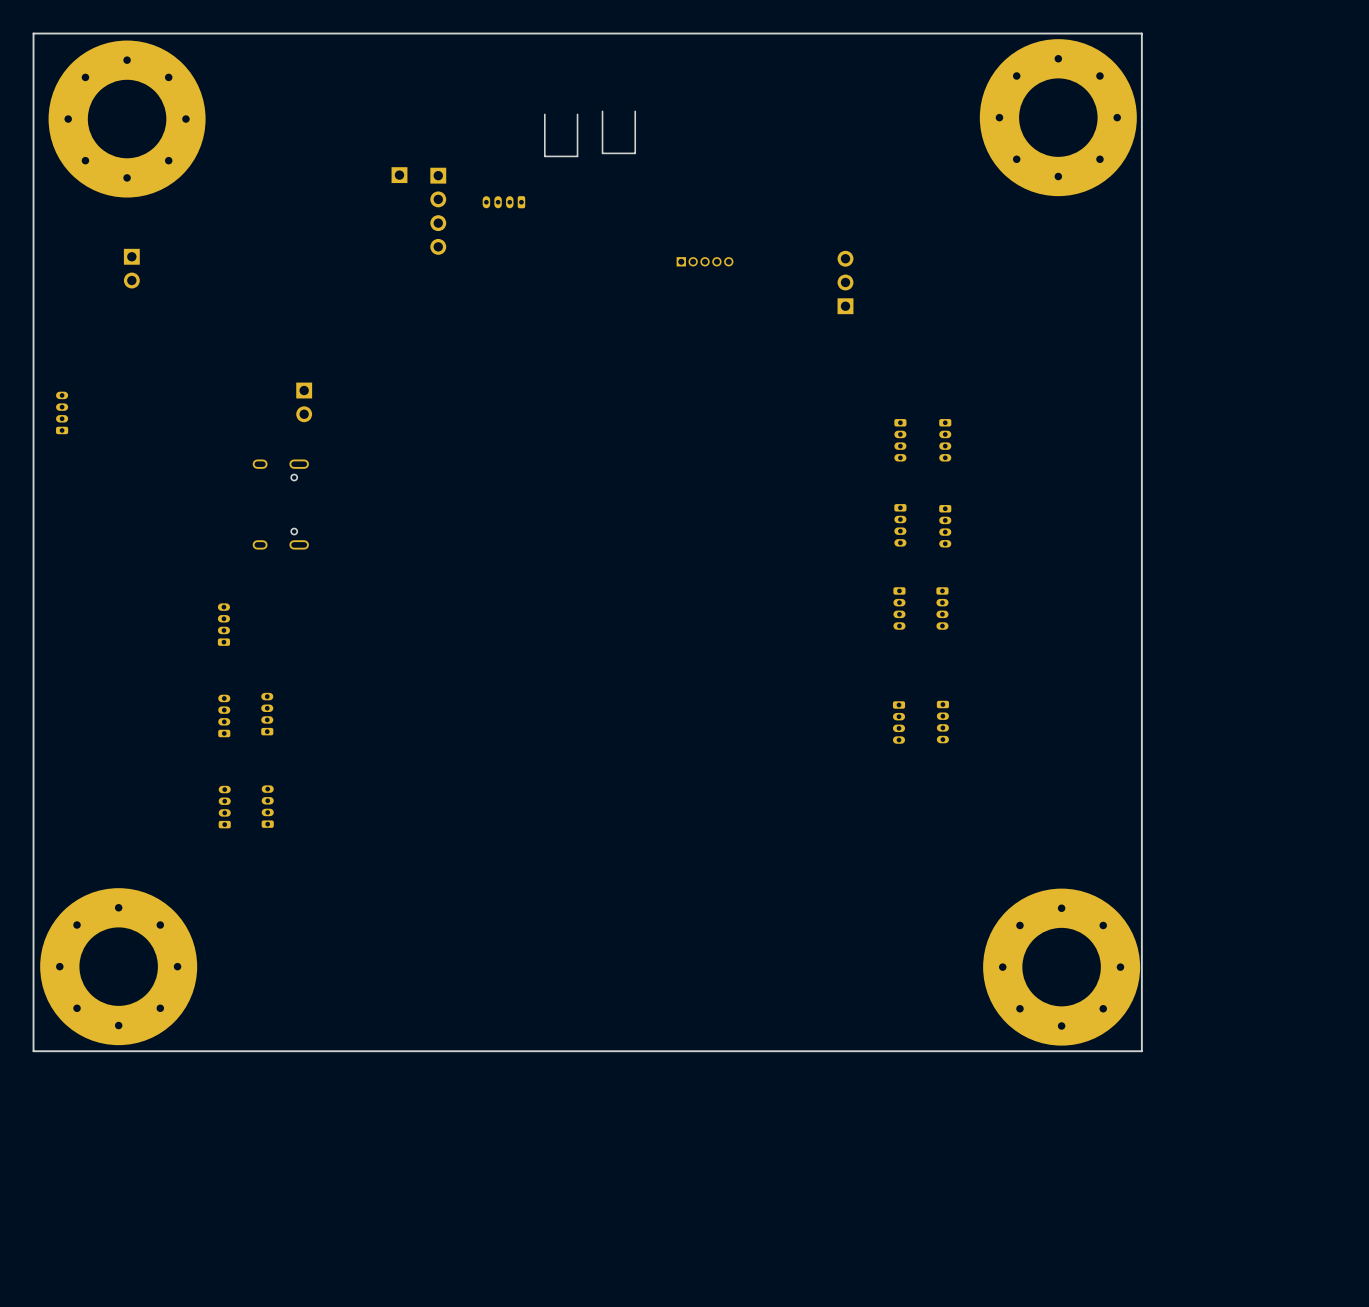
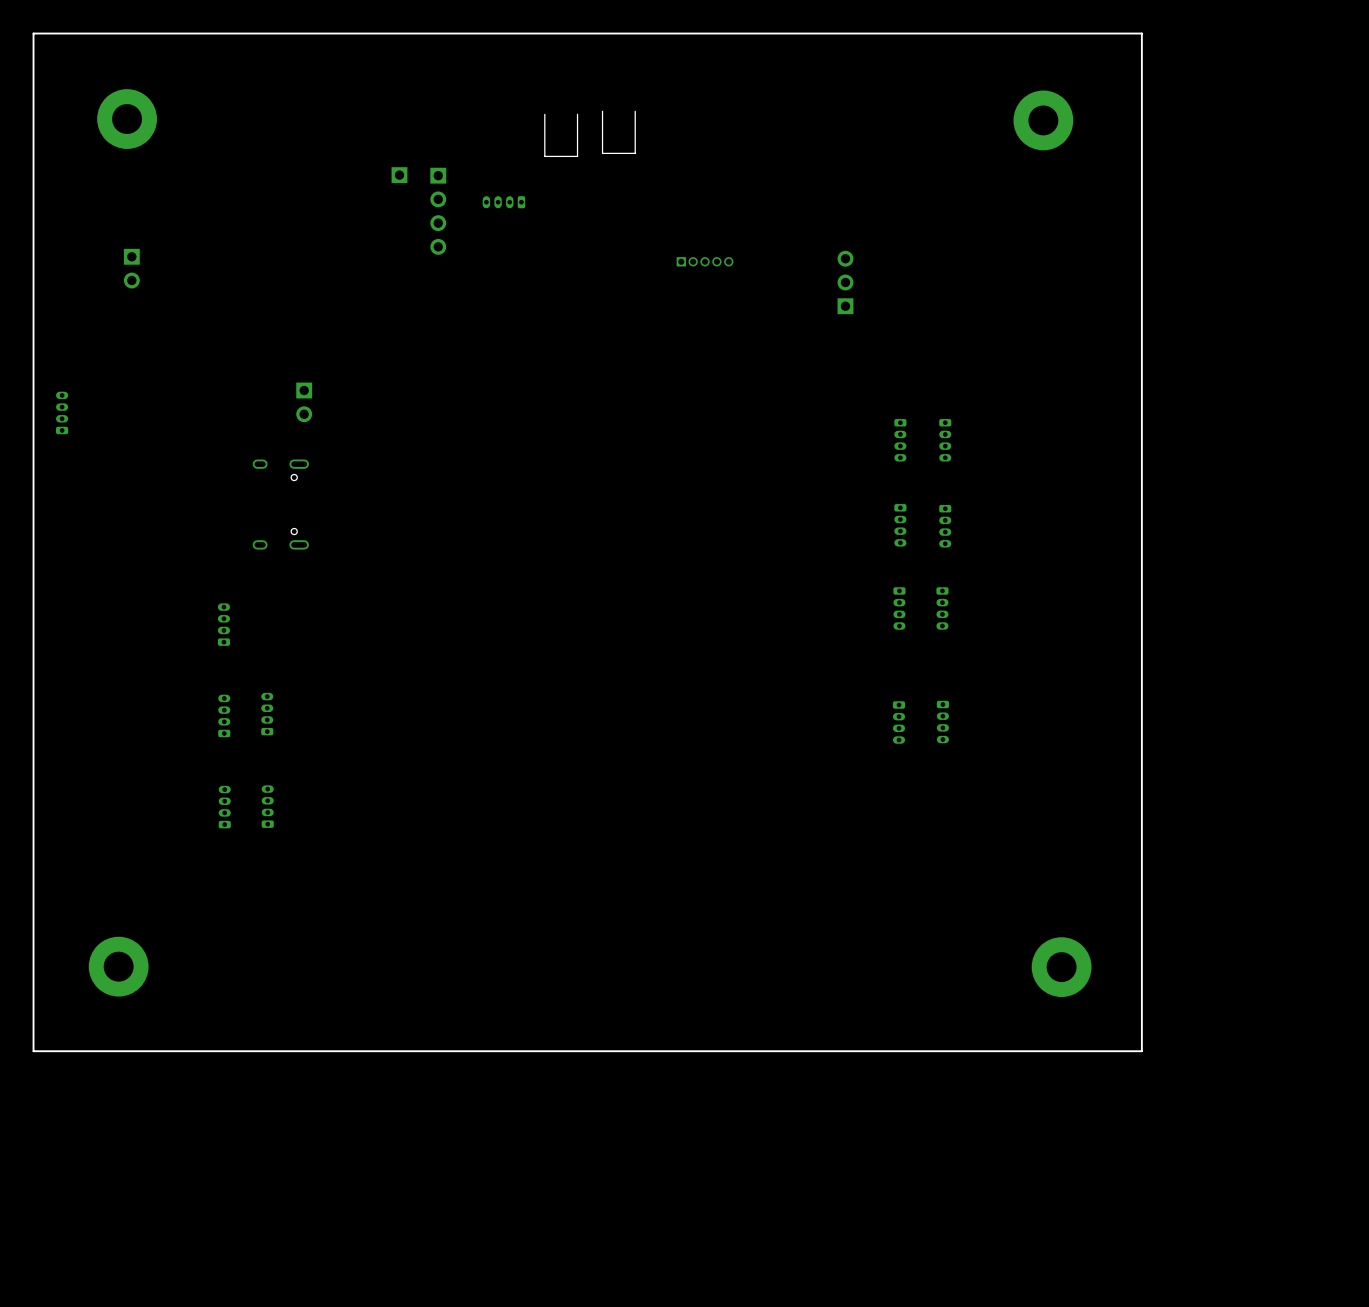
part footprint: [48, 40, 206, 198] -> [97, 89, 157, 149]
part: (1058, 117) -> none
part: none -> (1043, 120)
part footprint: [40, 888, 198, 1046] -> [88, 936, 149, 997]
part footprint: [983, 888, 1141, 1046] -> [1031, 937, 1092, 998]

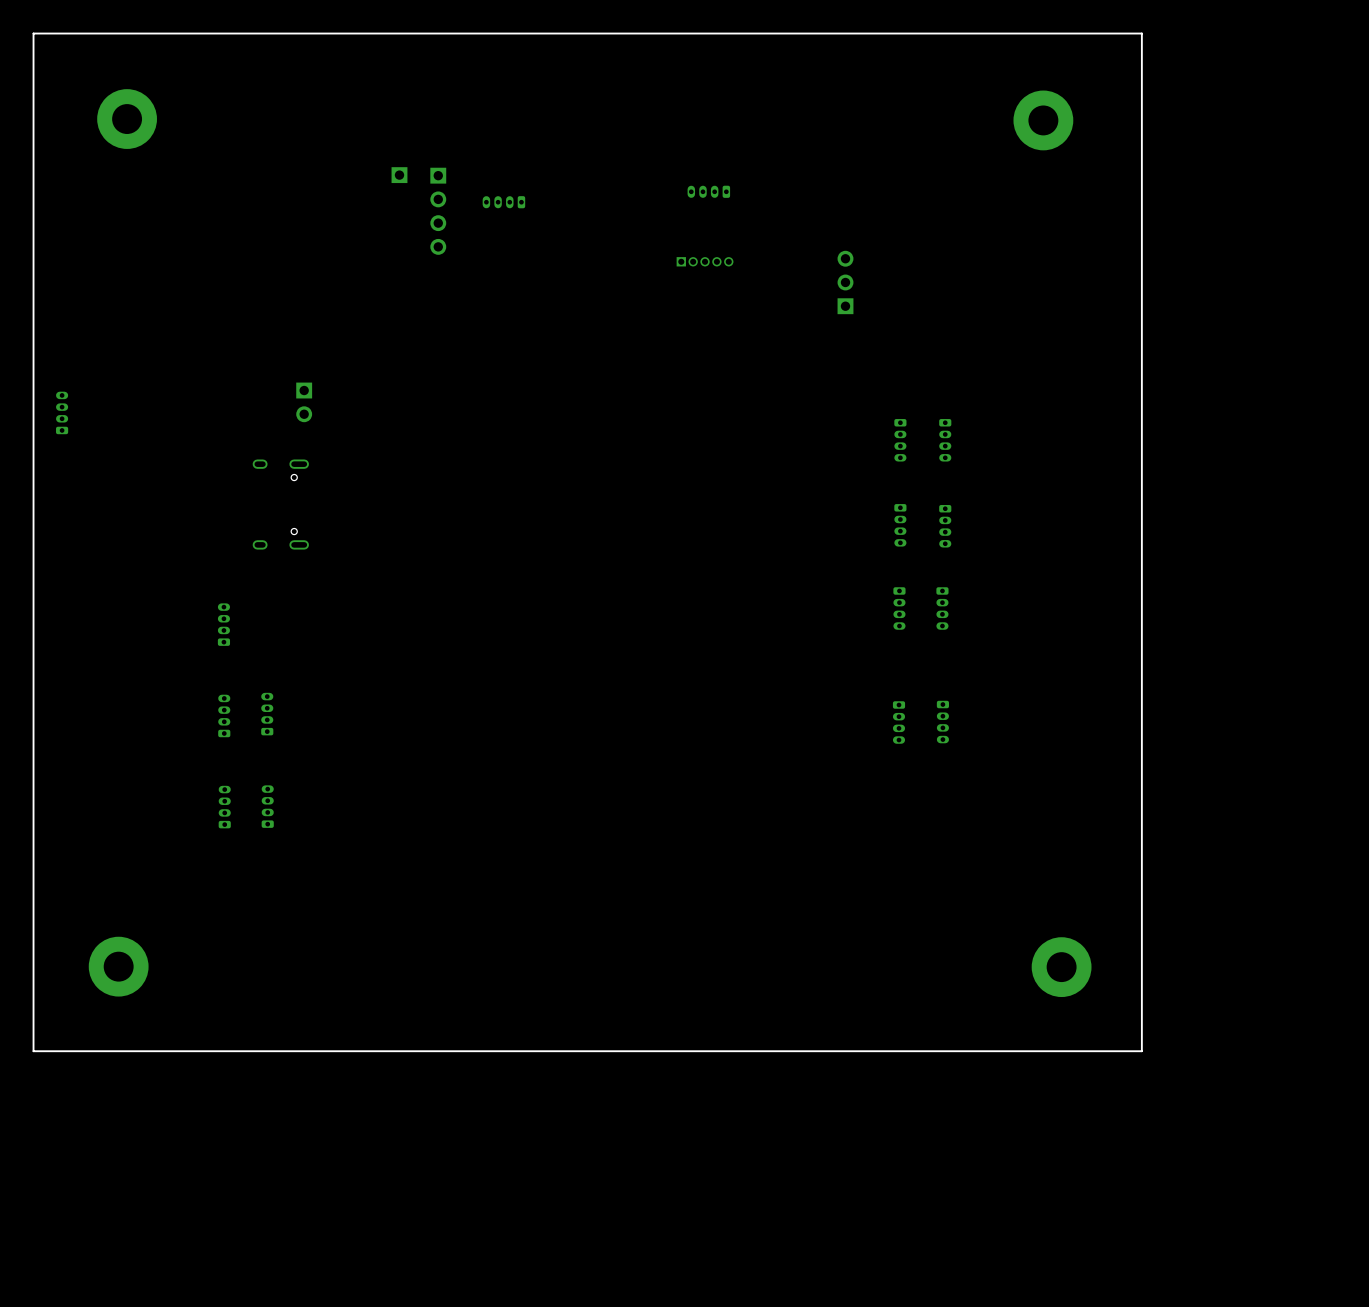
part: (618, 132) -> none
part: (561, 135) -> none
part: none -> (708, 191)
part: (131, 268) -> none

